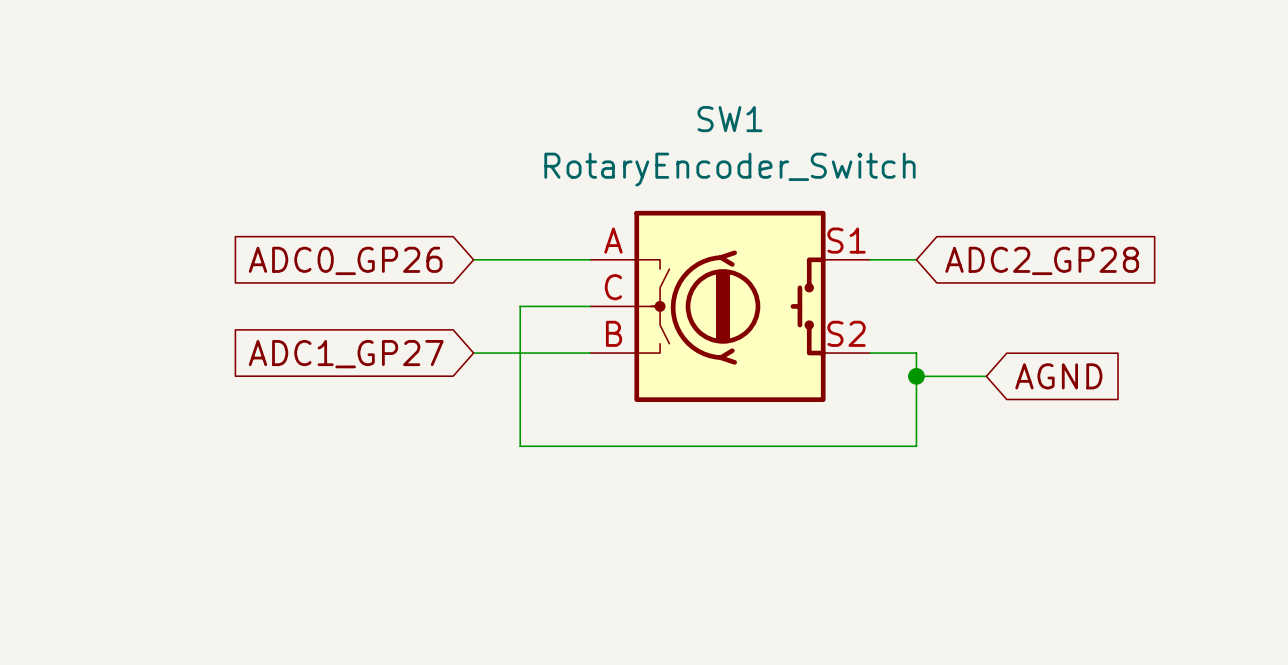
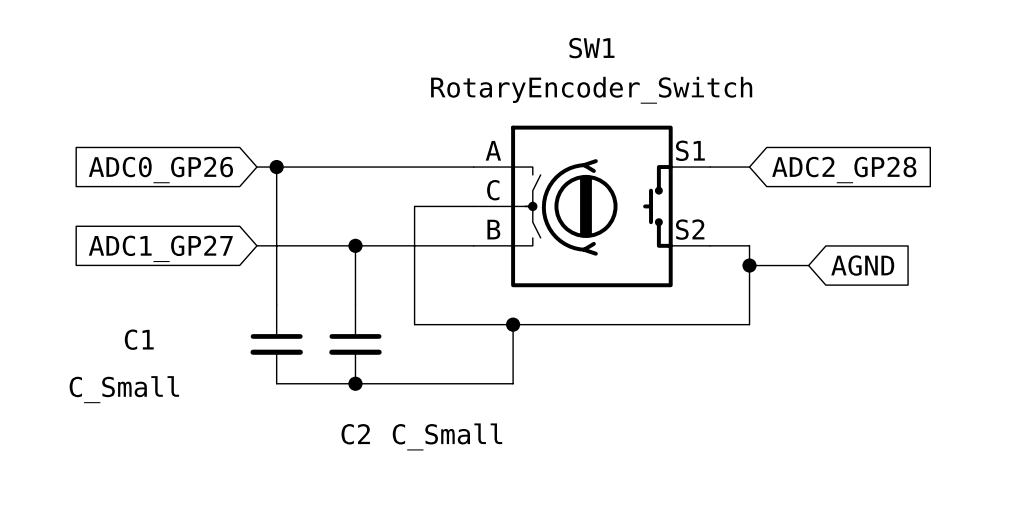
wire: none -> (256, 167) (375, 167)
wire: none -> (276, 167) (276, 304)
junction: none -> (276, 167)
global label position: ADC0_GP26 (345, 260) -> ADC0_GP26 (160, 170)
wire: none -> (256, 245) (375, 245)
wire: none -> (355, 245) (355, 304)
junction: none -> (355, 245)
global label position: ADC1_GP27 (346, 354) -> ADC1_GP27 (160, 248)
wire: none -> (513, 324) (513, 383) (276, 383)
junction: none -> (513, 324)
C1: none -> C_Small (276, 344)
C2: none -> C_Small (355, 344)
junction: none -> (355, 383)

